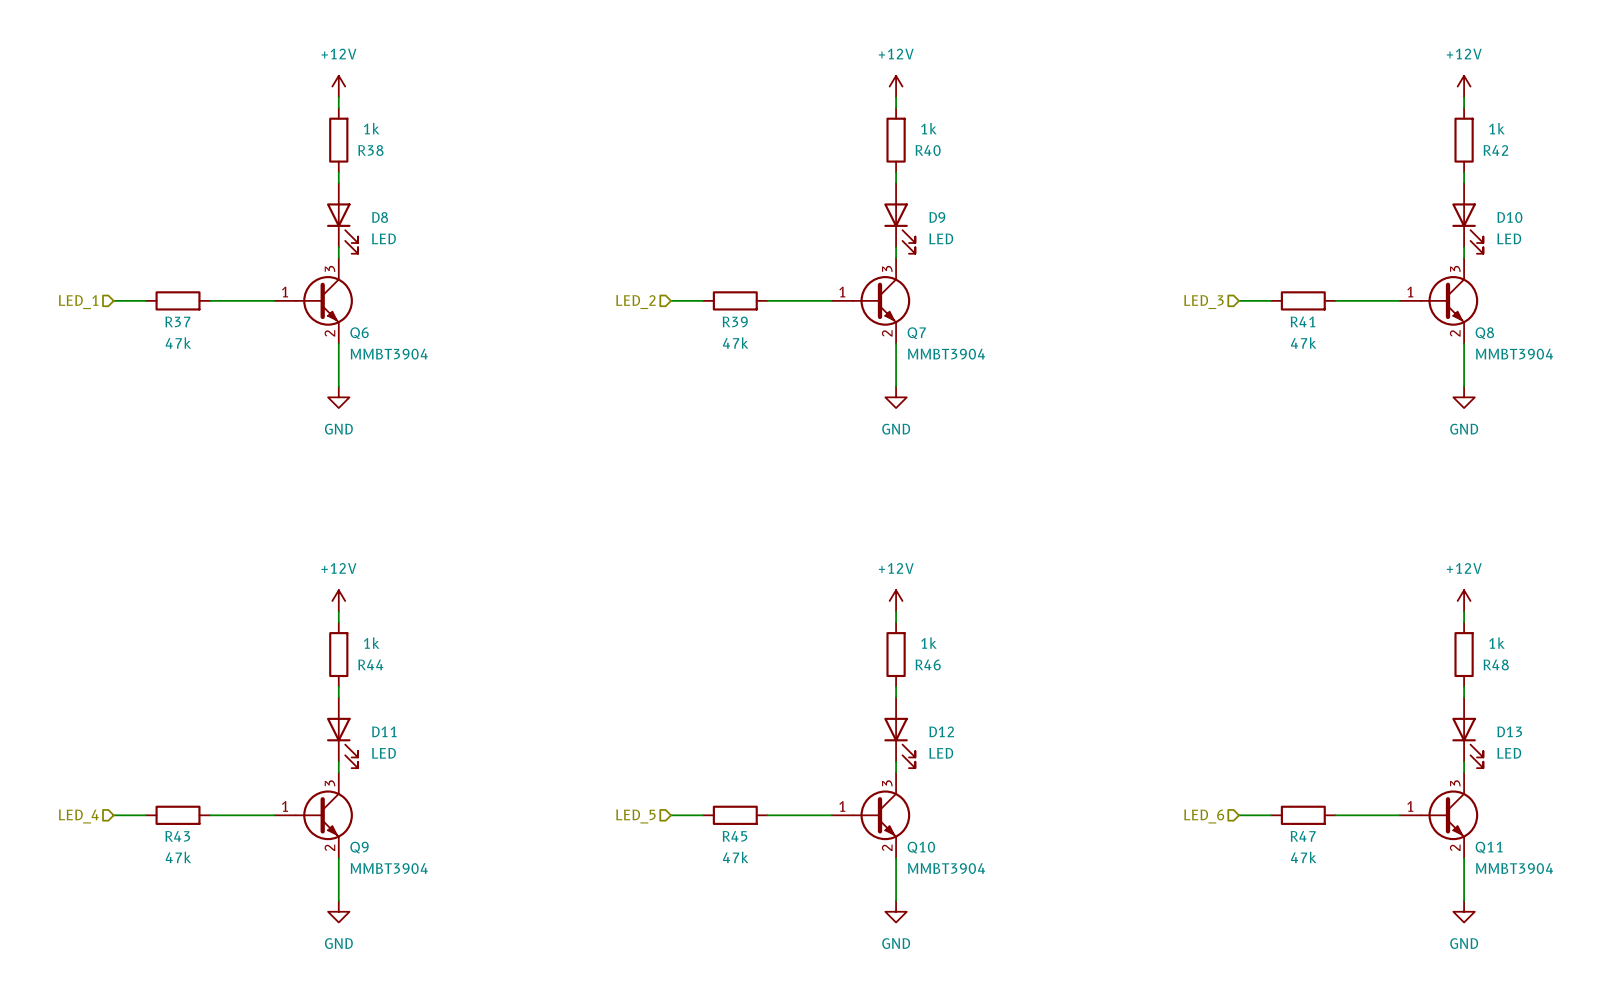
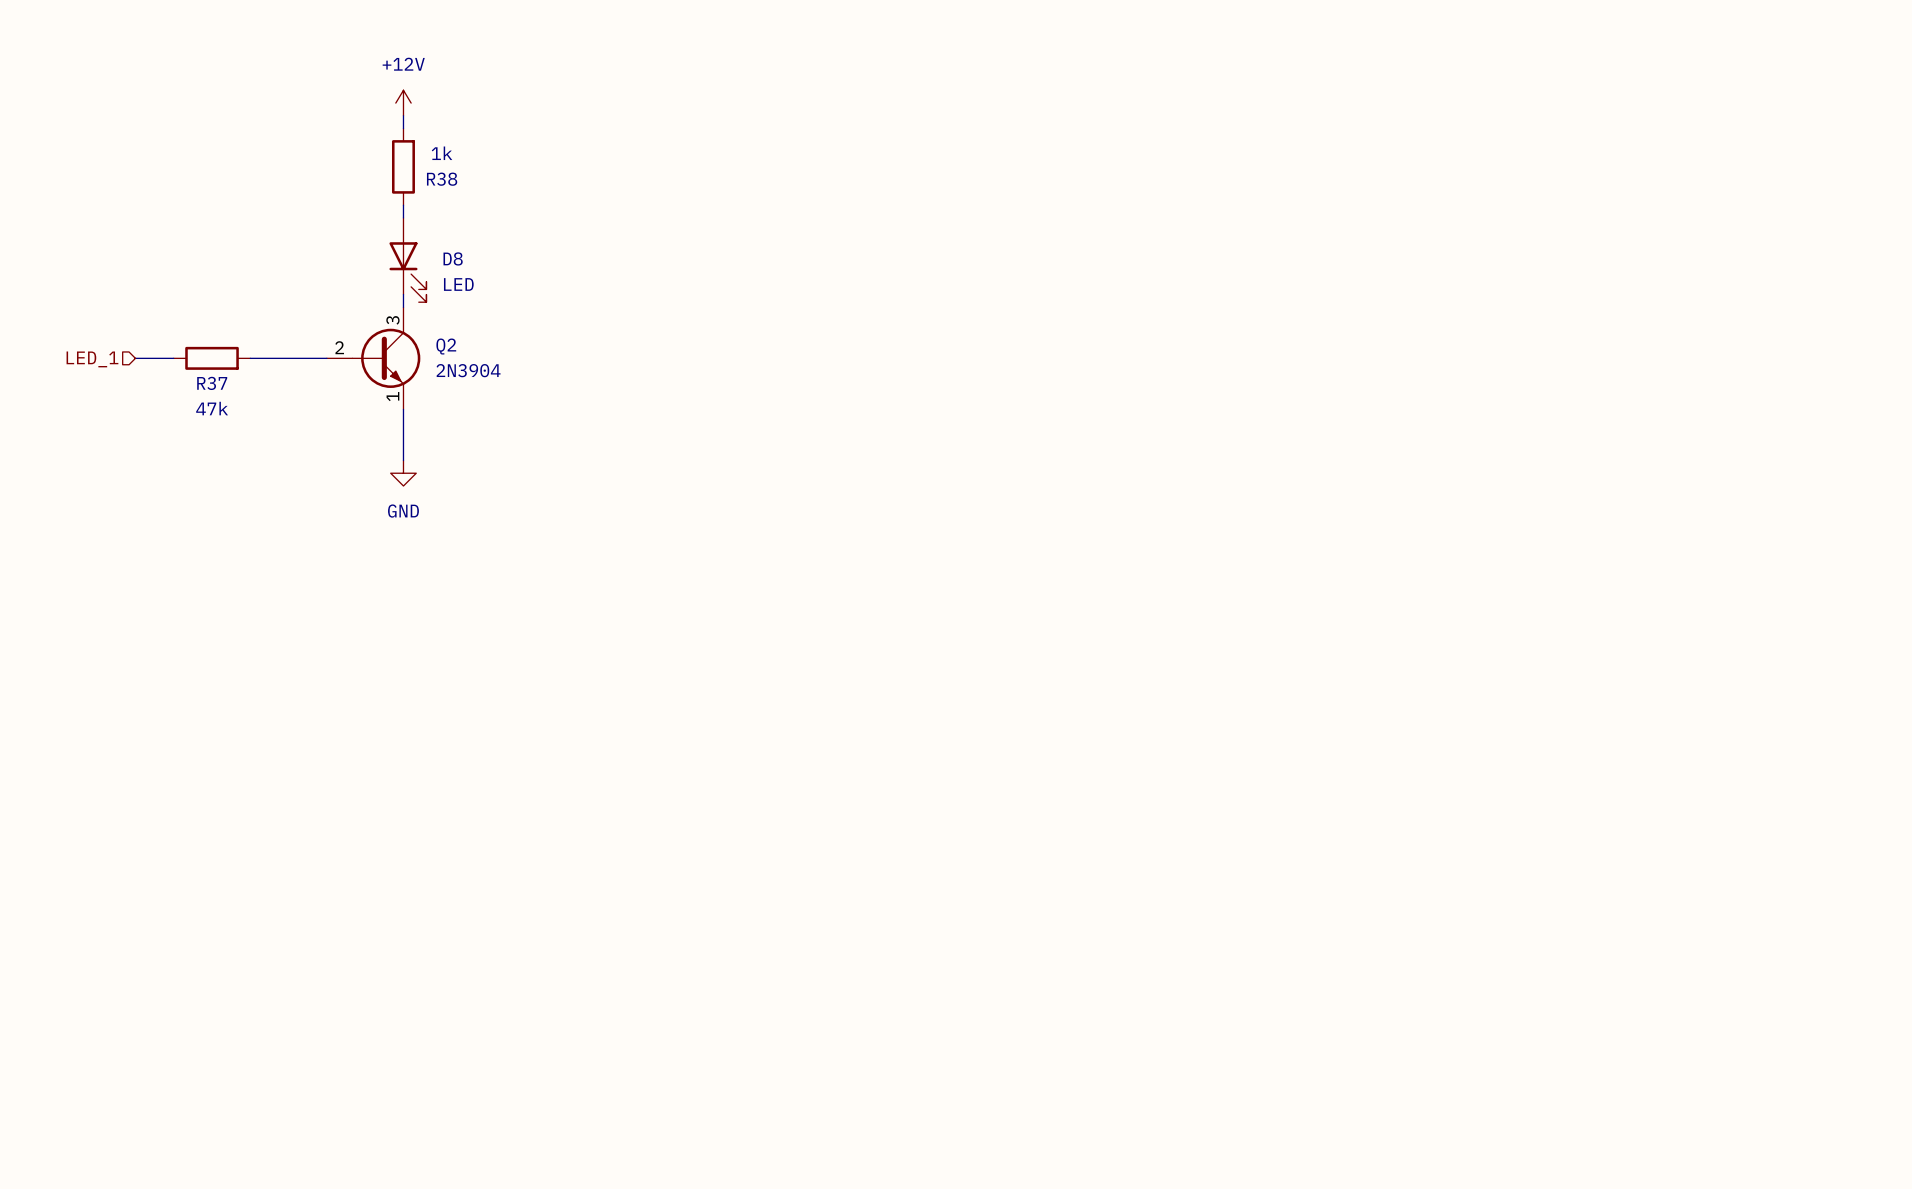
power symbol: +12V (896, 86) -> none
power symbol: +12V (1464, 86) -> none
wire: (896, 97) (896, 107) -> none
wire: (1464, 97) (1464, 107) -> none
R40: 1k (896, 140) -> none
R42: 1k (1464, 140) -> none
wire: (896, 172) (896, 183) -> none
wire: (1464, 172) (1464, 183) -> none
D9: LED (899, 218) -> none
D10: LED (1467, 218) -> none
wire: (896, 247) (896, 258) -> none
wire: (1464, 247) (1464, 258) -> none
Q6 pin number: 1 (285, 292) -> 2 (339, 347)
wire: (671, 300) (703, 300) -> none
R39: 47k (735, 300) -> none
wire: (767, 300) (831, 300) -> none
Q7: MMBT3904 (870, 300) -> none
wire: (1239, 300) (1271, 300) -> none
R41: 47k (1303, 300) -> none
wire: (1335, 300) (1399, 300) -> none
Q8: MMBT3904 (1439, 300) -> none
hierarchical label: LED_2 (635, 302) -> none
hierarchical label: LED_3 (1203, 302) -> none
Q6 pin number: 2 (329, 333) -> 1 (392, 396)
Q6 name: Q6 (359, 333) -> Q2 (446, 346)
wire: (896, 343) (896, 386) -> none
wire: (1464, 343) (1464, 386) -> none
Q6 value: MMBT3904 (389, 354) -> 2N3904 (468, 370)
power symbol: GND (896, 397) -> none
power symbol: GND (1464, 397) -> none
power symbol: +12V (338, 600) -> none
power symbol: +12V (896, 600) -> none
power symbol: +12V (1464, 600) -> none
wire: (338, 611) (338, 622) -> none
wire: (896, 611) (896, 622) -> none
wire: (1464, 611) (1464, 622) -> none
R44: 1k (338, 654) -> none
R46: 1k (896, 654) -> none
R48: 1k (1464, 654) -> none
wire: (338, 686) (338, 697) -> none
wire: (896, 686) (896, 697) -> none
wire: (1464, 686) (1464, 697) -> none
D11: LED (342, 732) -> none
D12: LED (899, 732) -> none
D13: LED (1467, 732) -> none
wire: (338, 761) (338, 772) -> none
wire: (896, 761) (896, 772) -> none
wire: (1464, 761) (1464, 772) -> none
wire: (113, 815) (145, 815) -> none
R43: 47k (178, 815) -> none
wire: (210, 815) (274, 815) -> none
Q9: MMBT3904 (313, 815) -> none
wire: (671, 815) (703, 815) -> none
R45: 47k (735, 815) -> none
wire: (767, 815) (831, 815) -> none
Q10: MMBT3904 (870, 815) -> none
wire: (1239, 815) (1271, 815) -> none
R47: 47k (1303, 815) -> none
wire: (1335, 815) (1399, 815) -> none
Q11: MMBT3904 (1439, 815) -> none
hierarchical label: LED_4 (78, 816) -> none
hierarchical label: LED_5 (635, 816) -> none
hierarchical label: LED_6 (1204, 816) -> none
wire: (338, 858) (338, 901) -> none
wire: (896, 858) (896, 901) -> none
wire: (1464, 858) (1464, 901) -> none
power symbol: GND (338, 911) -> none
power symbol: GND (896, 911) -> none
power symbol: GND (1464, 911) -> none

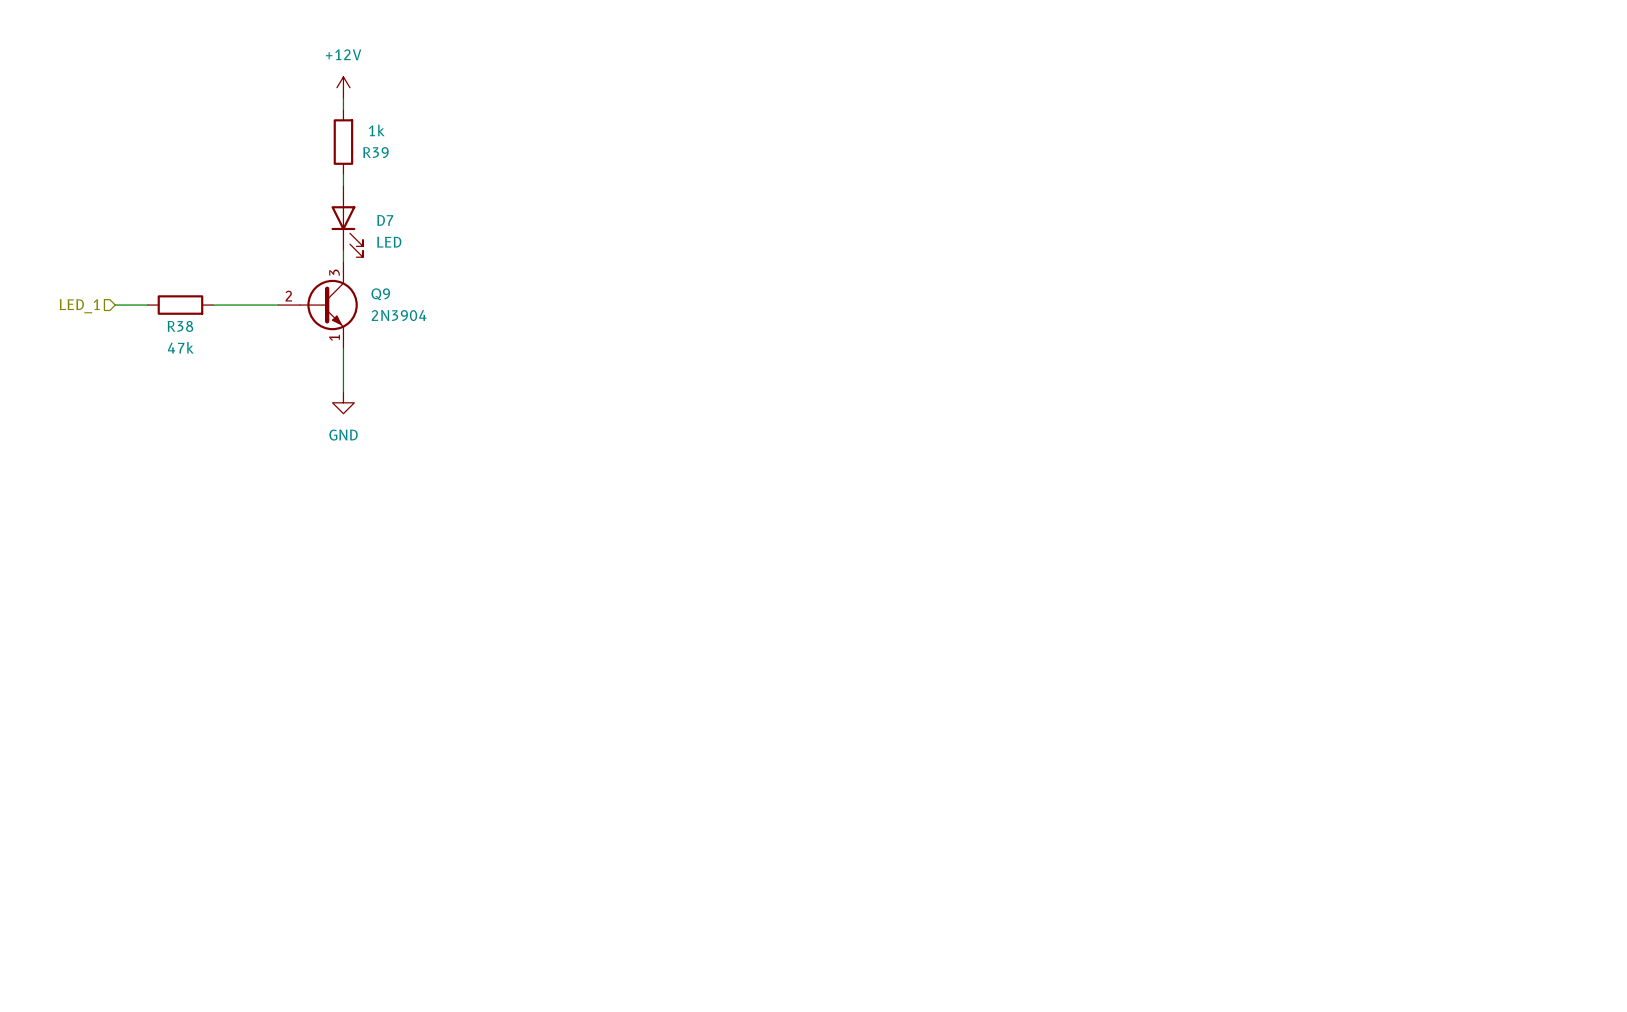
R38 name: R38 (442, 179) -> R39 (375, 152)
D8 name: D8 (453, 258) -> D7 (385, 220)
Q2 name: Q2 (446, 346) -> Q9 (380, 294)
R37 name: R37 (212, 383) -> R38 (180, 326)

